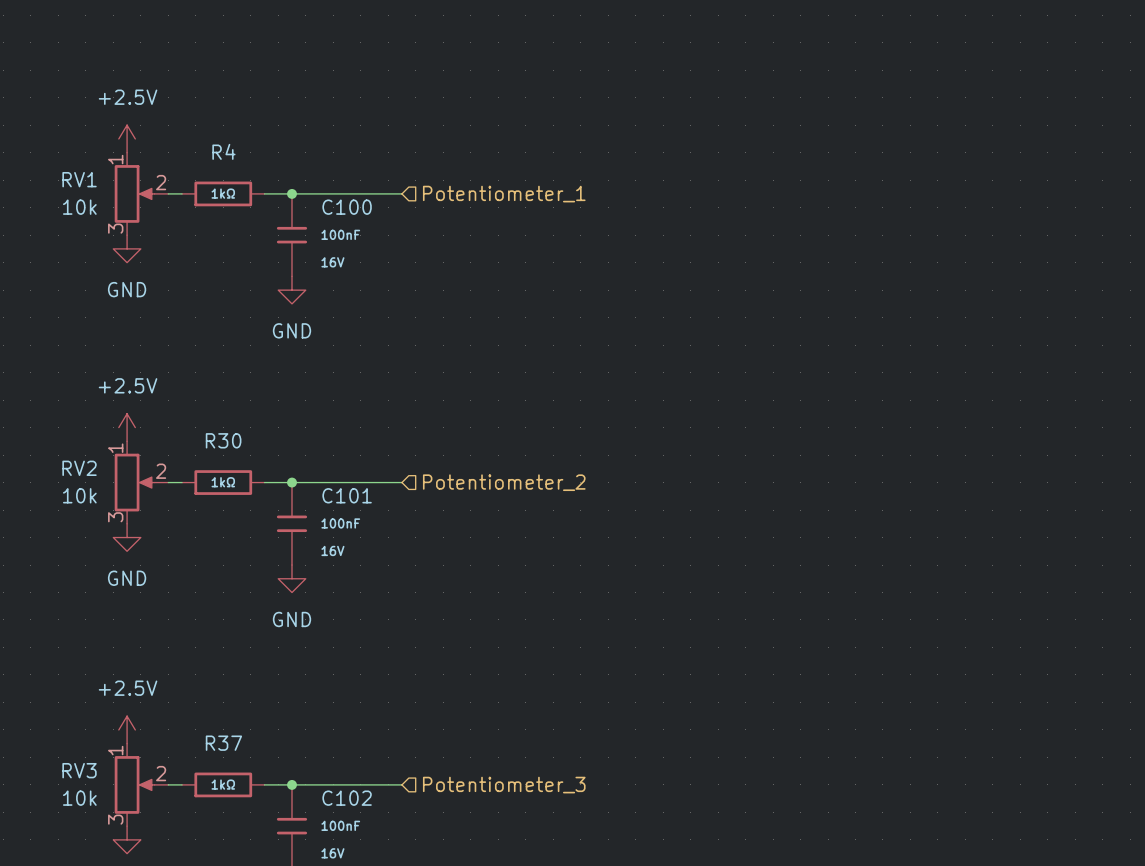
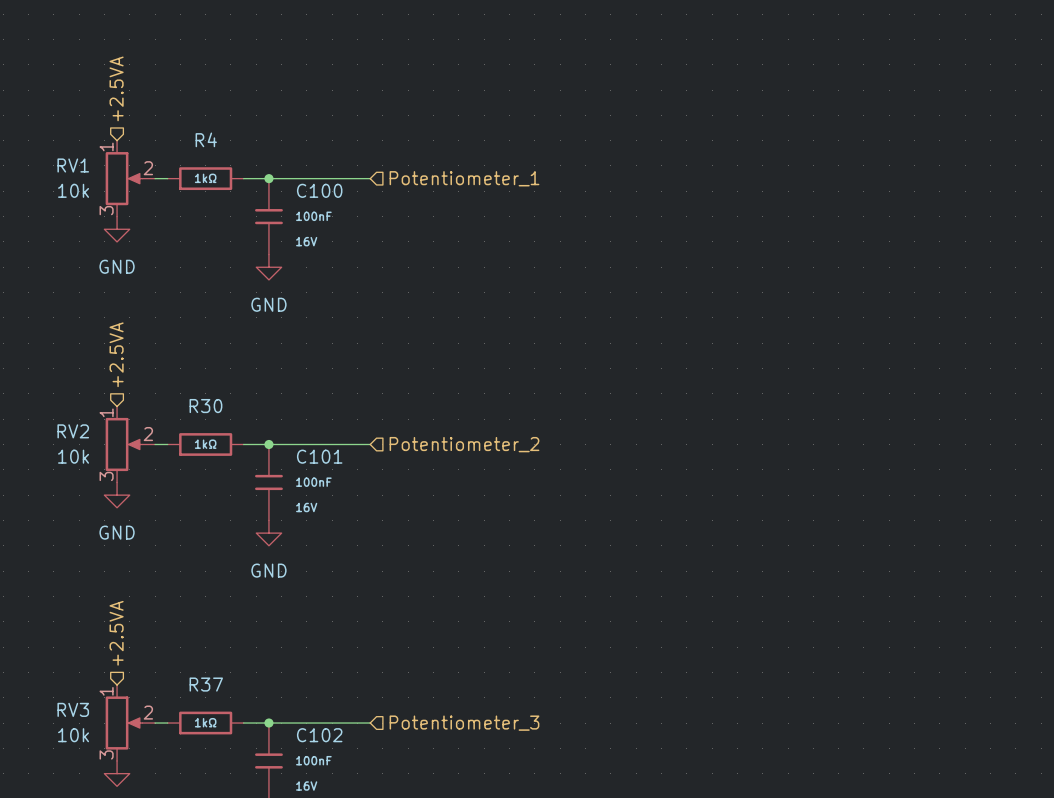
hierarchical label: none -> +2.5VA (116, 88)
power symbol: +2.5V (127, 138) -> none
hierarchical label: none -> +2.5VA (116, 354)
power symbol: +2.5V (127, 427) -> none
hierarchical label: none -> +2.5VA (116, 633)
power symbol: +2.5V (127, 729) -> none

